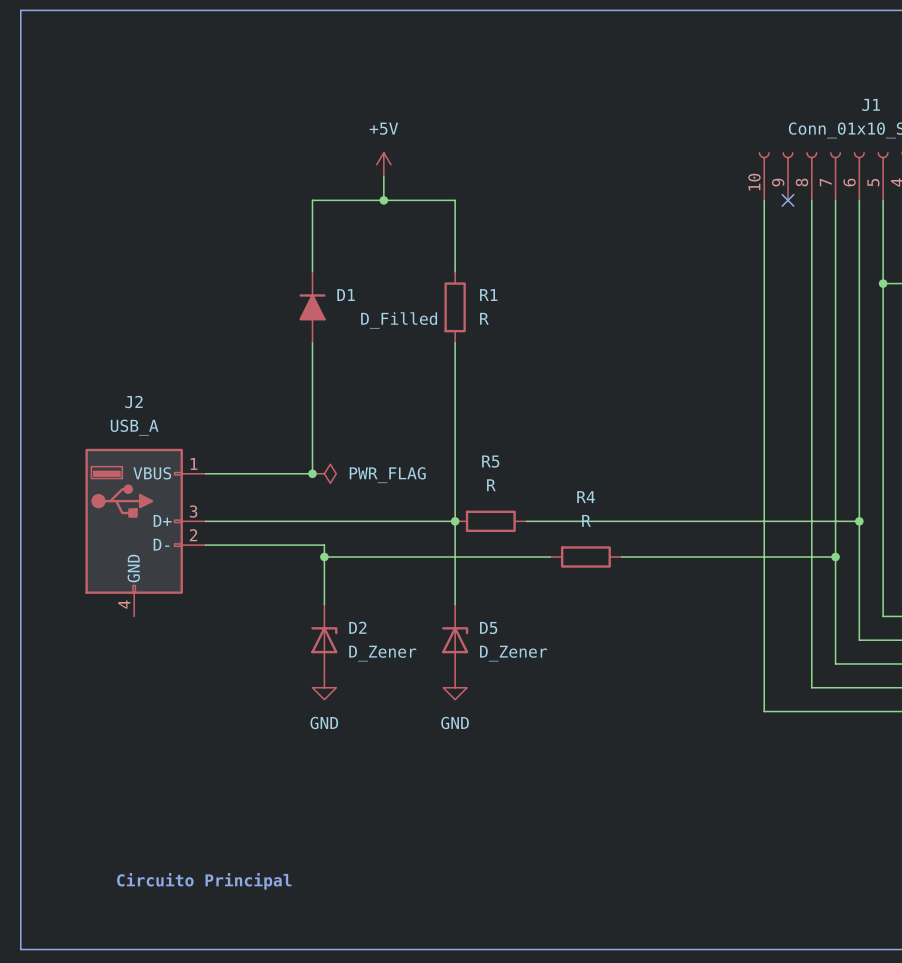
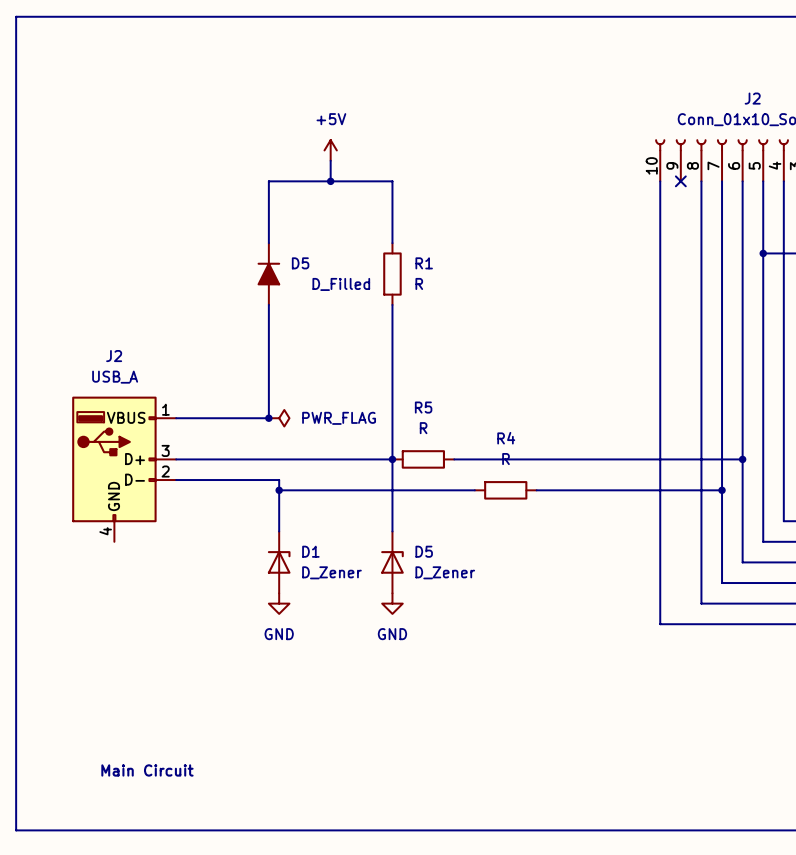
J1 name: J1 (871, 104) -> J2 (752, 98)
D1 name: D1 (346, 295) -> D5 (300, 263)
D2 name: D2 (357, 627) -> D1 (310, 551)
text: Circuito Principal (204, 881) -> Main Circuit (147, 770)

